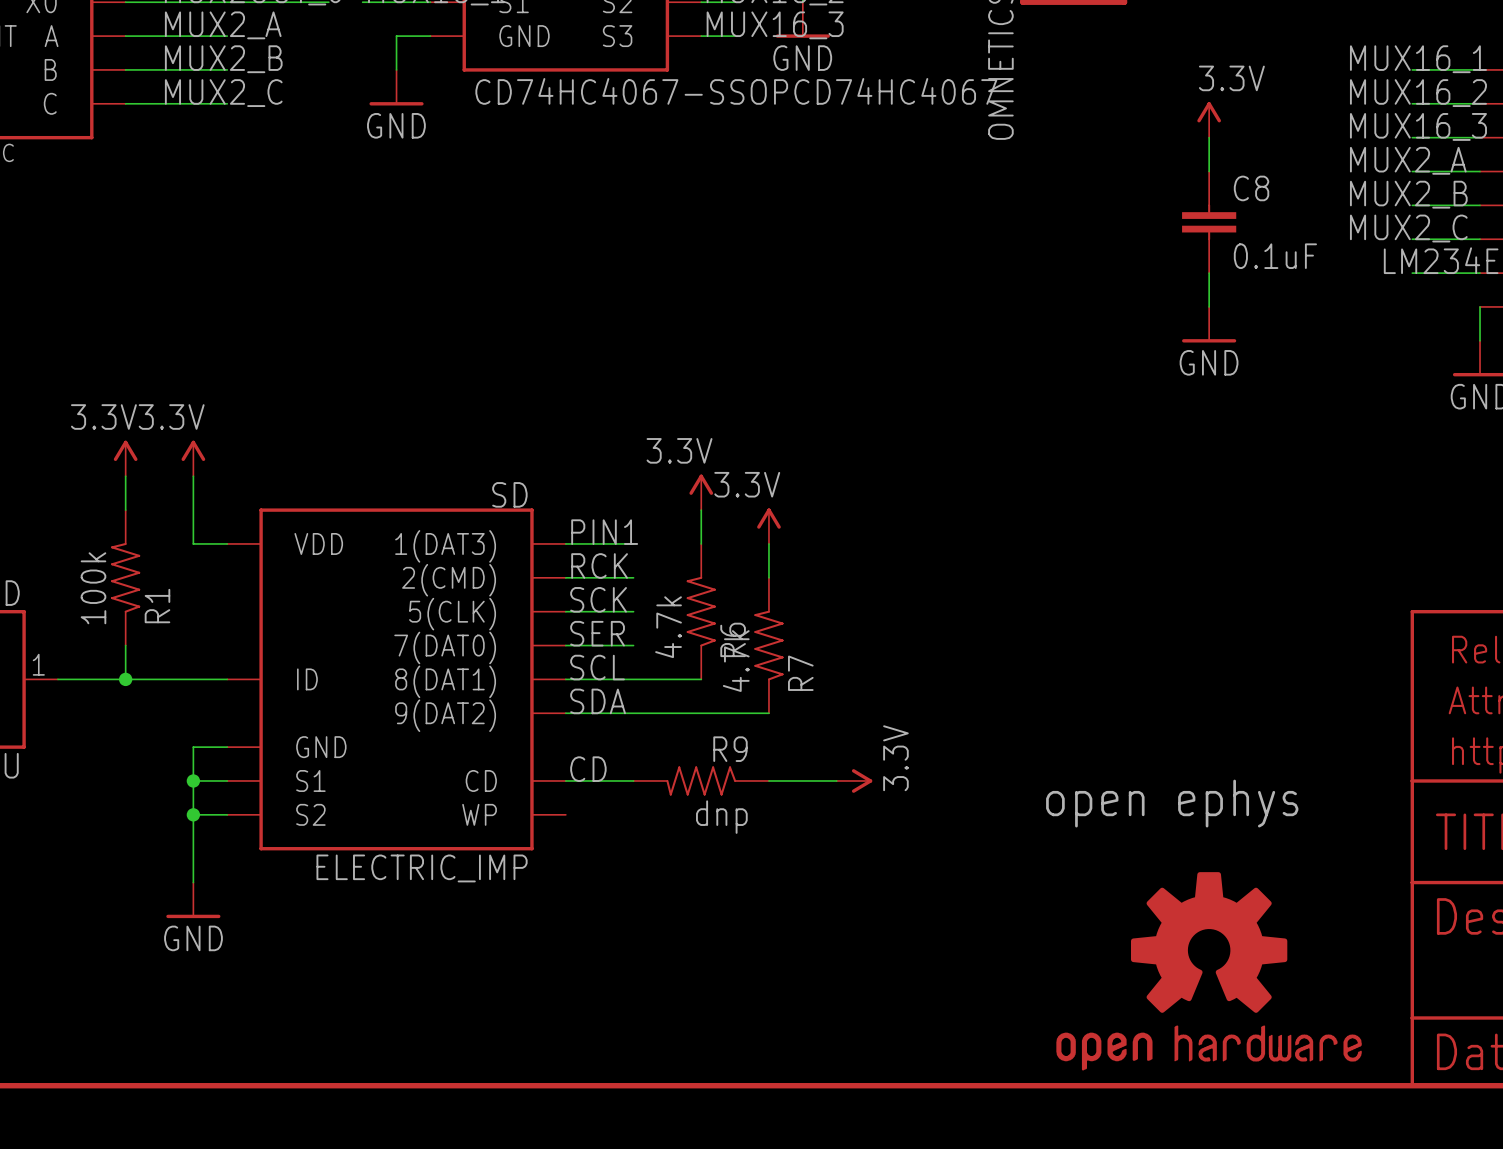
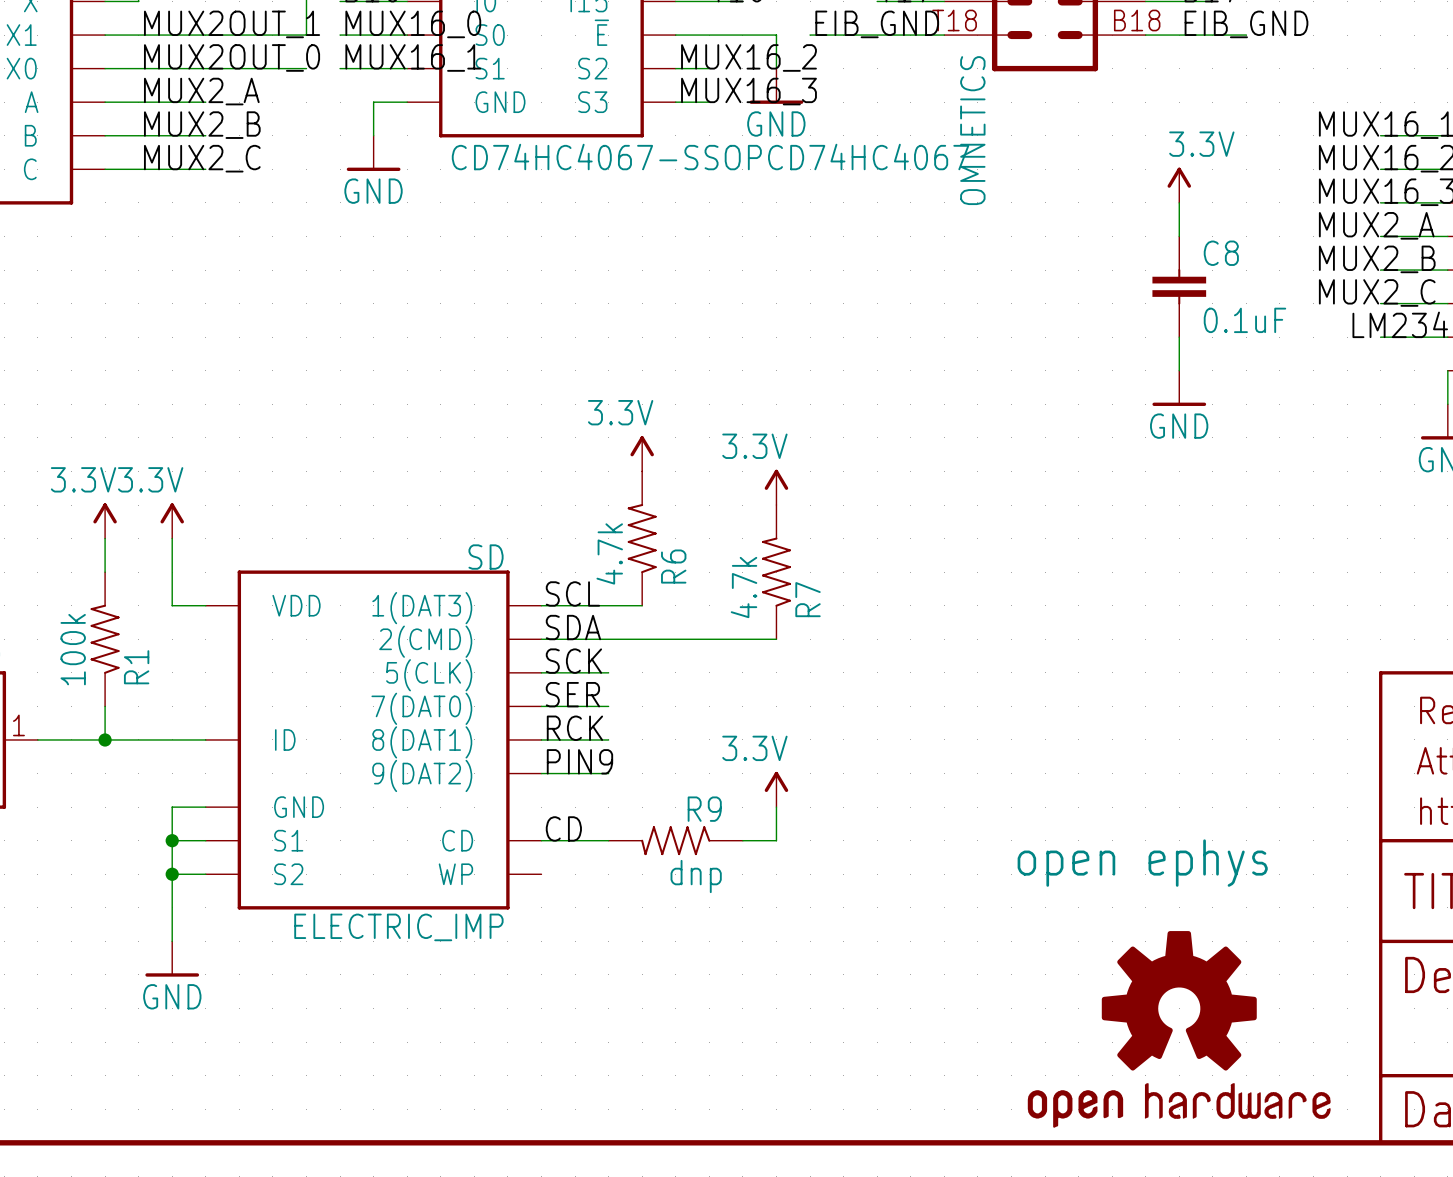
power symbol: none -> 3.3V (642, 453)
power symbol: none -> 3.3V (776, 487)
power symbol: 3.3V (701, 492) -> none
wire: (701, 510) (701, 543) -> none
power symbol: 3.3V (768, 526) -> none
label: PIN1 (604, 532) -> SCL (572, 593)
wire: none -> (608, 605) (642, 605)
wire: (768, 543) (768, 577) -> none
label: RCK (599, 565) -> SDA (573, 627)
wire: none -> (608, 639) (776, 639)
R6 position: (701, 611) -> (642, 538)
R7 position: (768, 645) -> (776, 572)
label: SCL (597, 667) -> RCK (574, 728)
wire: (633, 679) (701, 679) -> none
label: SDA (598, 701) -> PIN9 (579, 761)
wire: (633, 713) (768, 713) -> none
wire: (802, 780) (836, 780) -> (776, 840) (776, 807)
power symbol position: 3.3V (854, 780) -> 3.3V (776, 789)
power symbol rotation: 0° (862, 780) -> 90° counterclockwise (776, 781)

